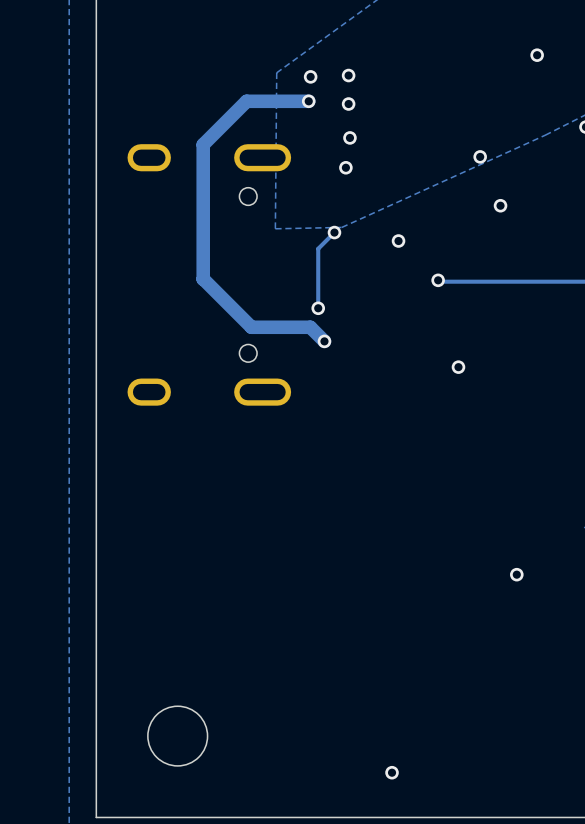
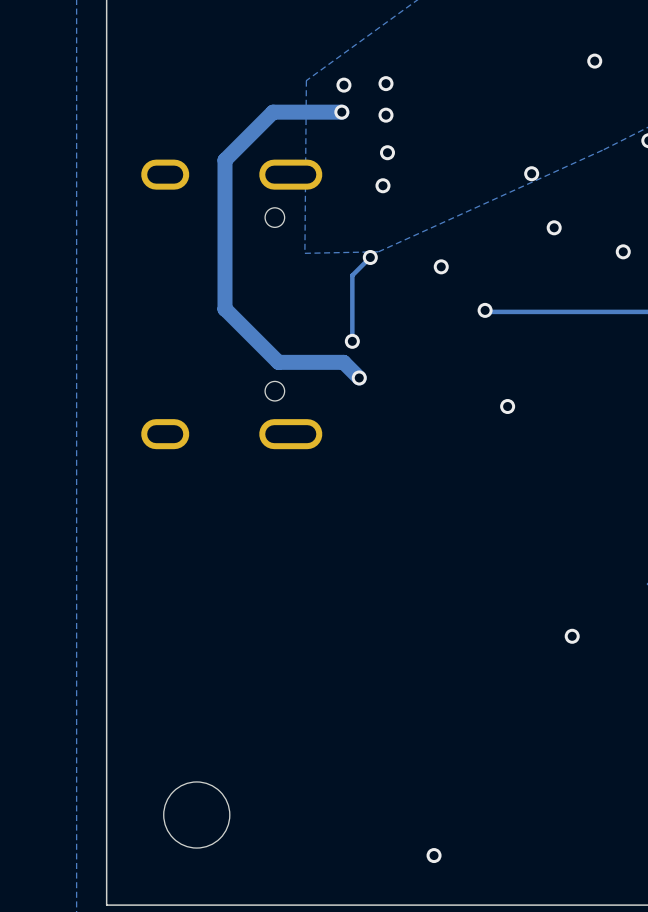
via: none -> (623, 251)

